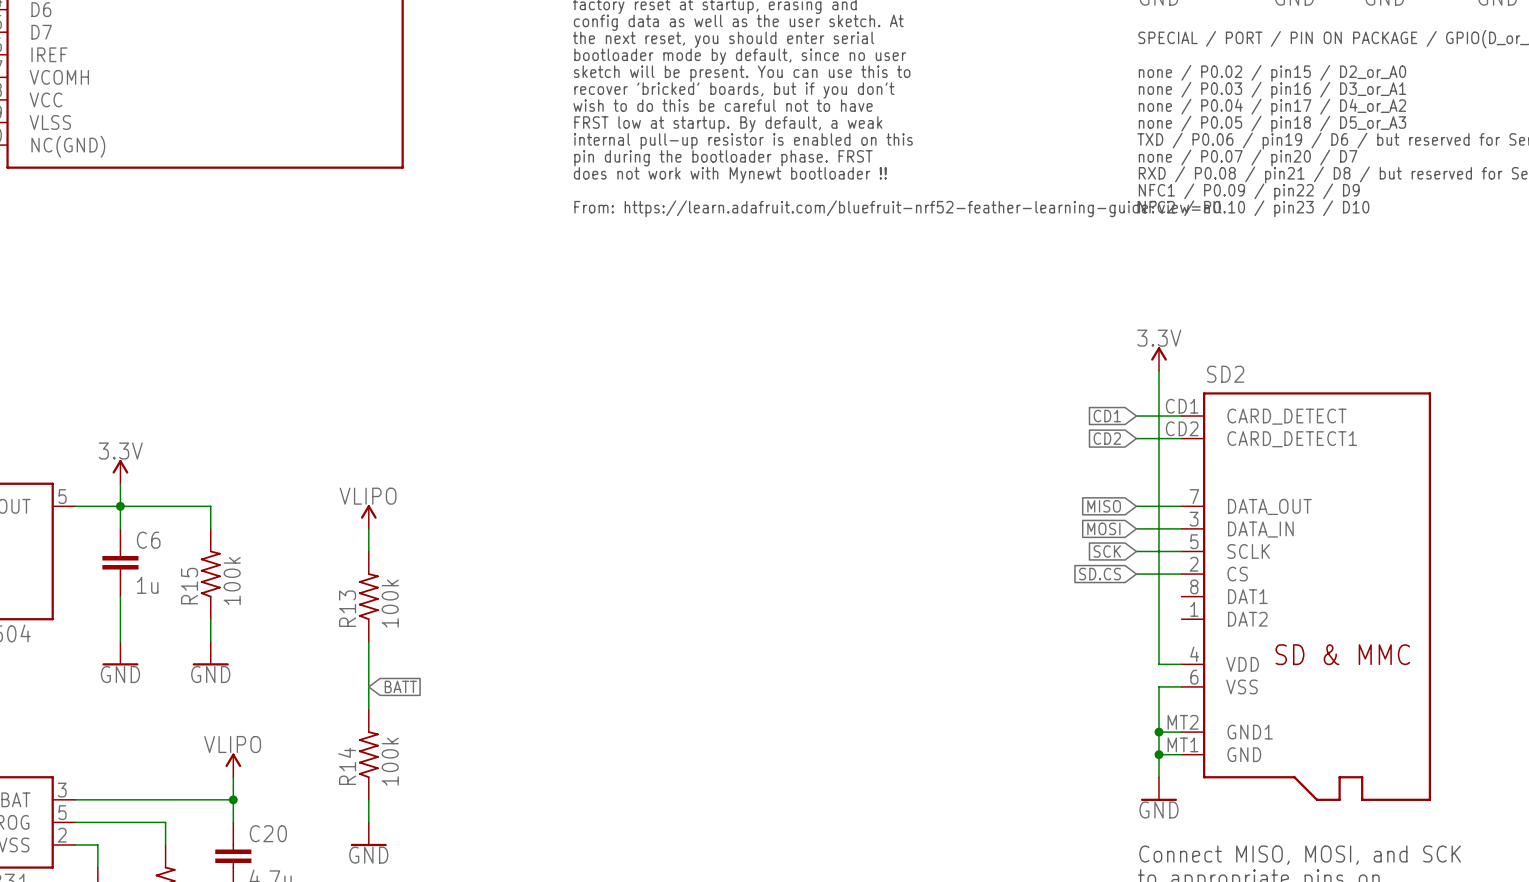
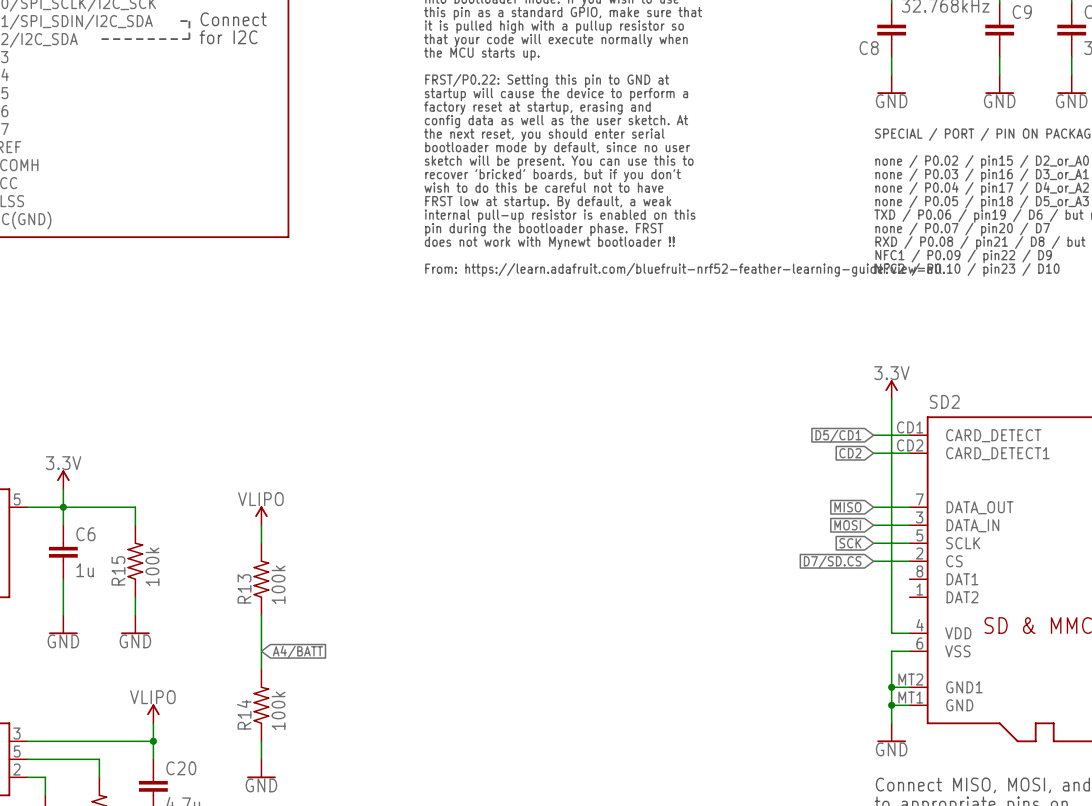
global label: CD1 (1107, 416) -> D5/CD1 (838, 436)
global label: SD.CS (1100, 574) -> D7/SD.CS (832, 562)
global label: BATT (400, 686) -> A4/BATT (297, 652)

